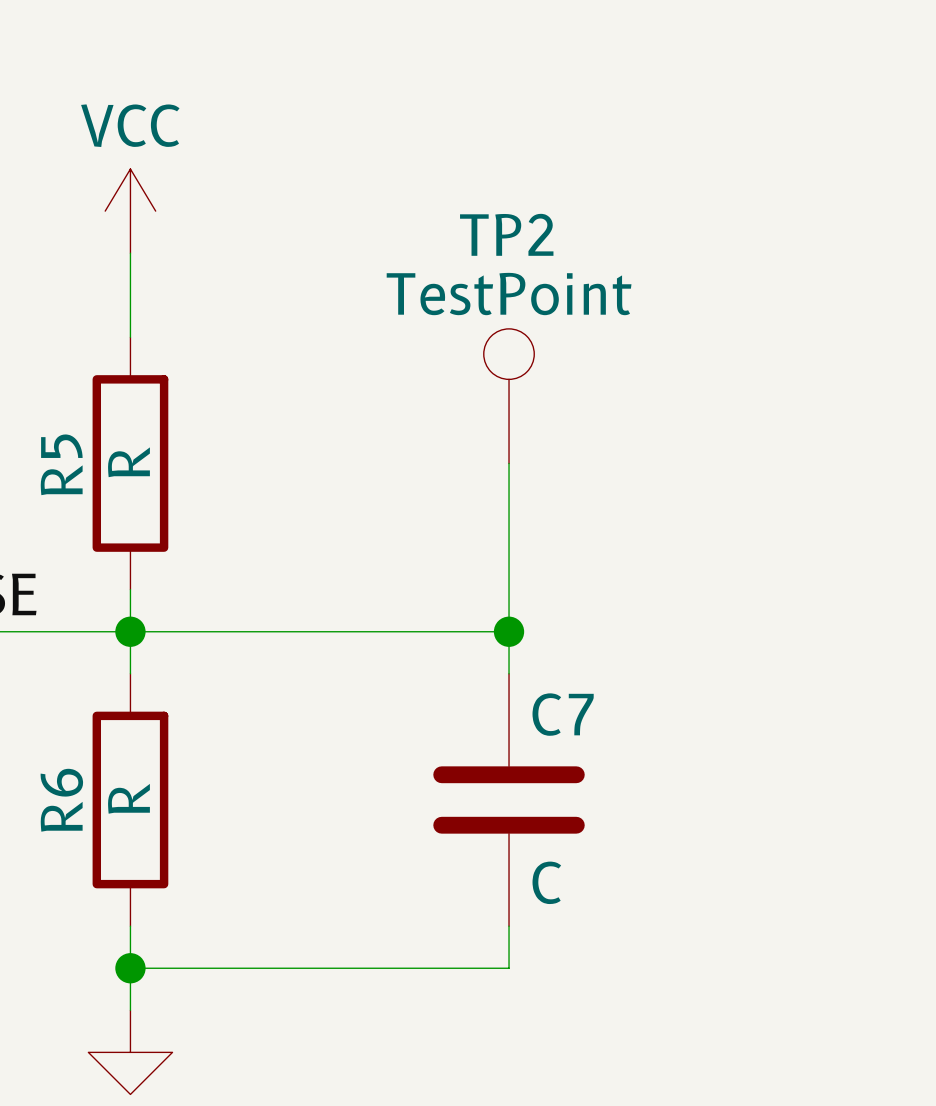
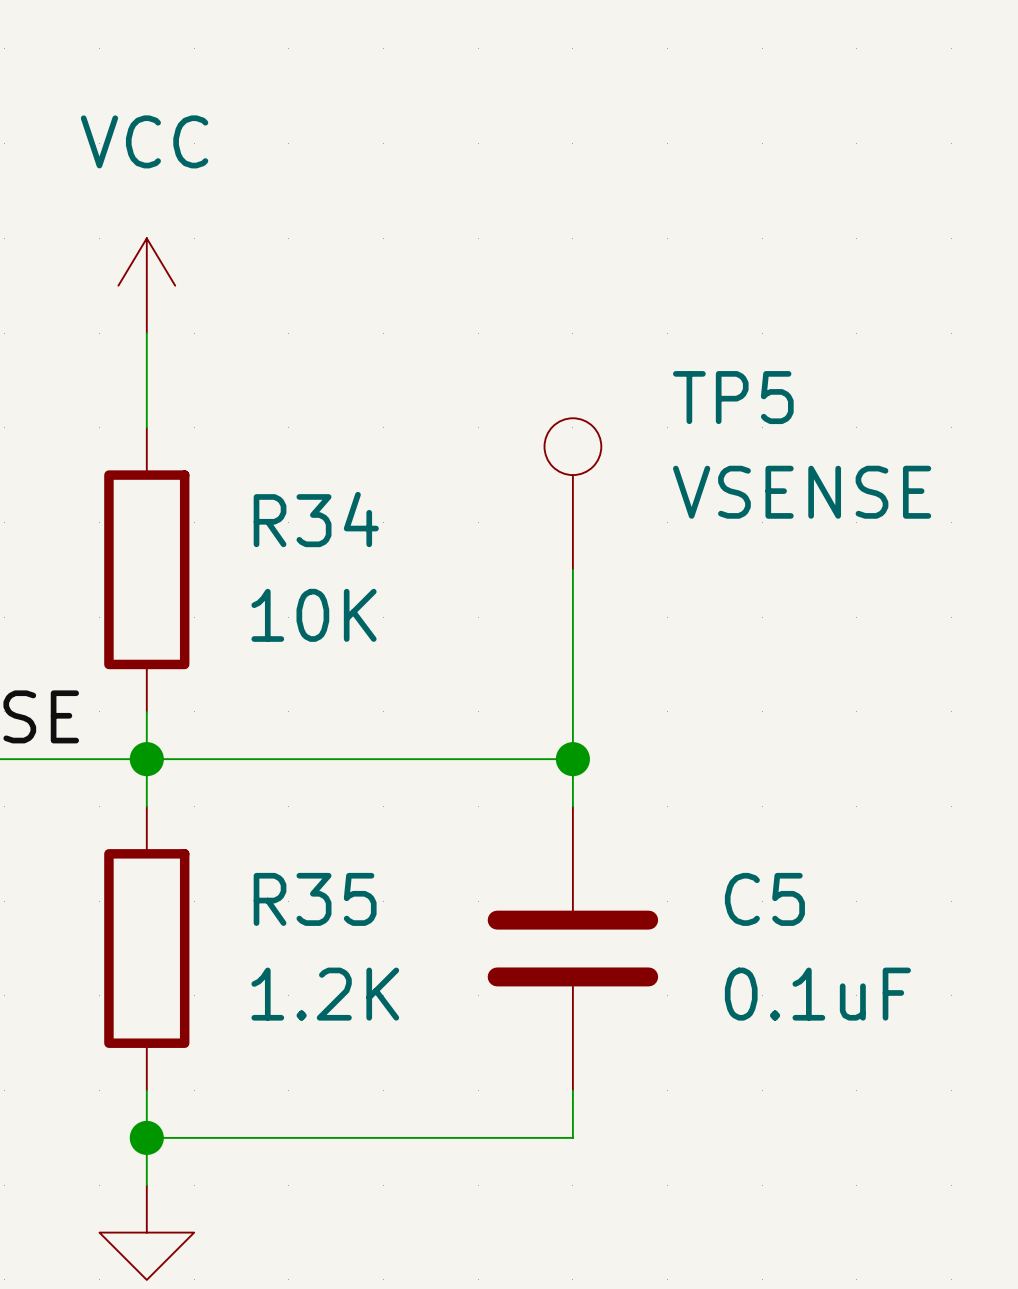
power symbol text position: VCC (130, 125) -> VCC (144, 141)
TP2 name: TP2 (506, 234) -> TP5 (733, 397)
TP2 value: TestPoint (509, 294) -> VSENSE (802, 492)
R5 value: R (128, 462) -> 10K (314, 615)
R5 name: R5 (61, 464) -> R34 (316, 519)
C7 name: C7 (563, 714) -> C5 (764, 899)
R6 value: R (128, 798) -> 1.2K (325, 994)
R6 name: R6 (61, 800) -> R35 (315, 899)
C7 value: C (546, 882) -> 0.1uF (817, 994)

